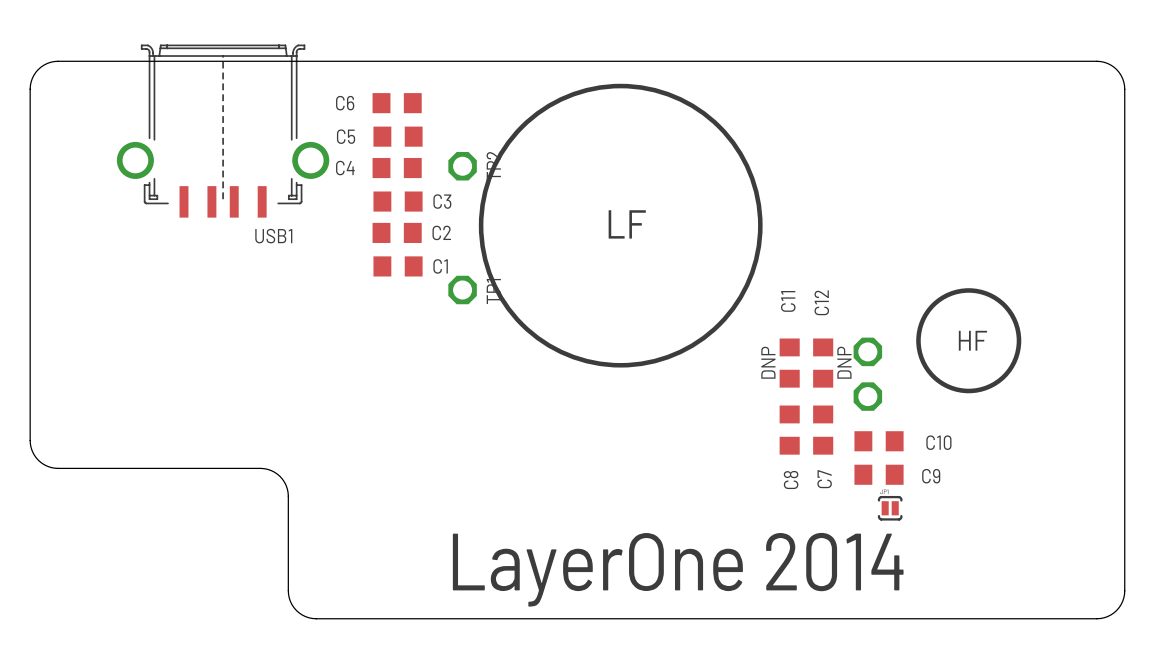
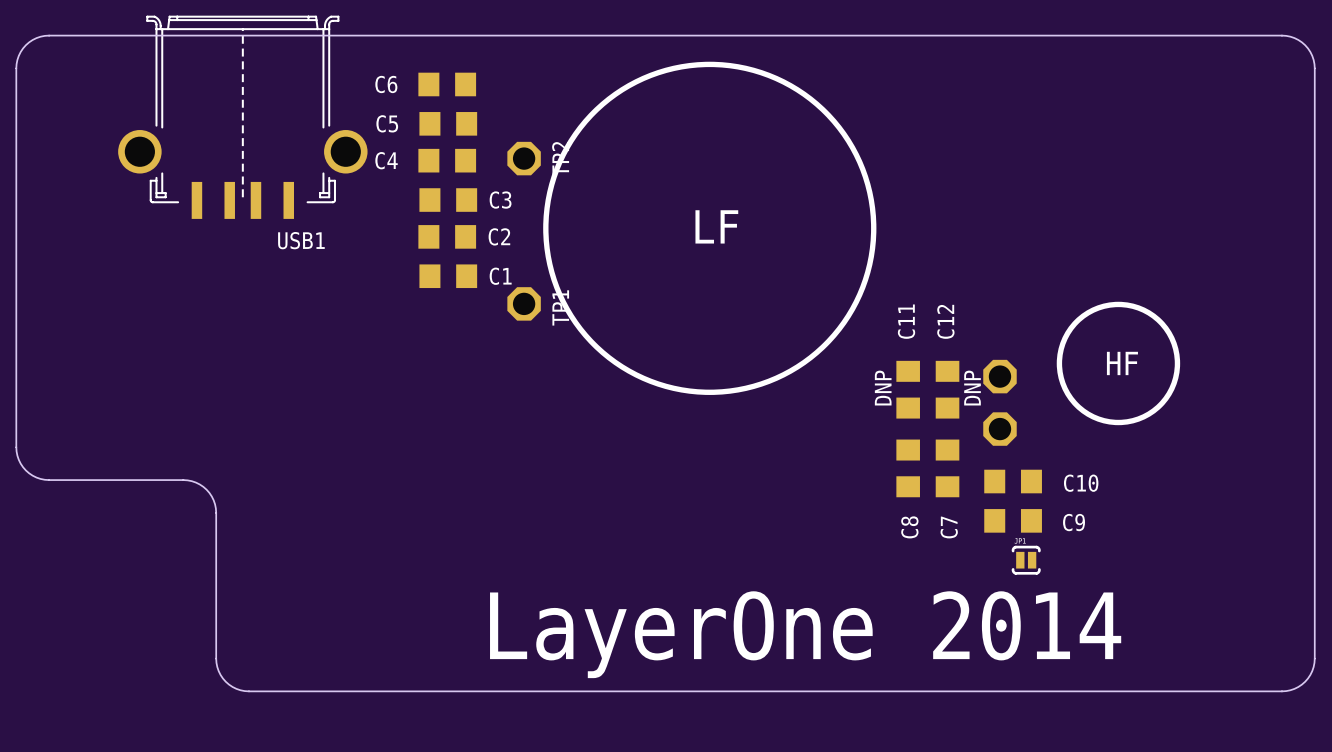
board edge: (30, 89) (32, 78) (38, 69) (47, 63) (58, 61) (1096, 61) (1107, 63) (1121, 75) (1124, 89) (1124, 594) (1116, 610) (1107, 616) (1096, 618) (312, 618) (296, 610) (289, 598) (288, 492) (284, 482) (277, 474) (260, 468) (50, 467) (38, 460) (32, 451) (30, 440) (30, 412) -> (16, 68) (18, 55) (25, 45) (36, 38) (49, 35) (1281, 35) (1294, 38) (1305, 45) (1310, 51) (1314, 68) (1314, 662) (1310, 674) (1305, 681) (1294, 688) (1281, 691) (244, 691) (232, 686) (225, 681) (220, 674) (216, 662) (216, 512) (213, 500) (206, 489) (195, 482) (183, 480) (40, 478) (32, 475) (23, 467) (18, 459) (16, 447)
text position: LayerOne 2014 (678, 569) -> LayerOne 2014 (805, 634)

